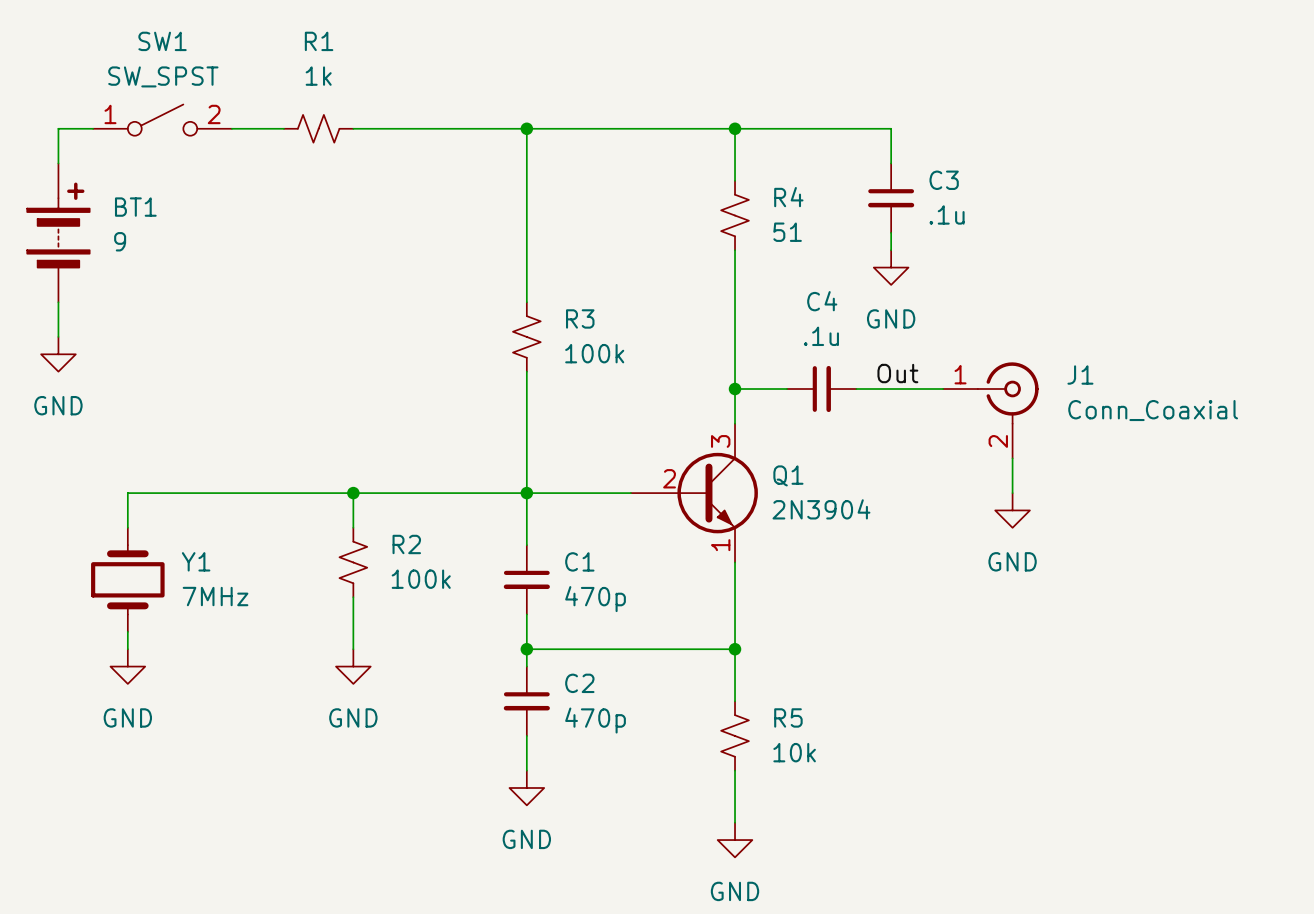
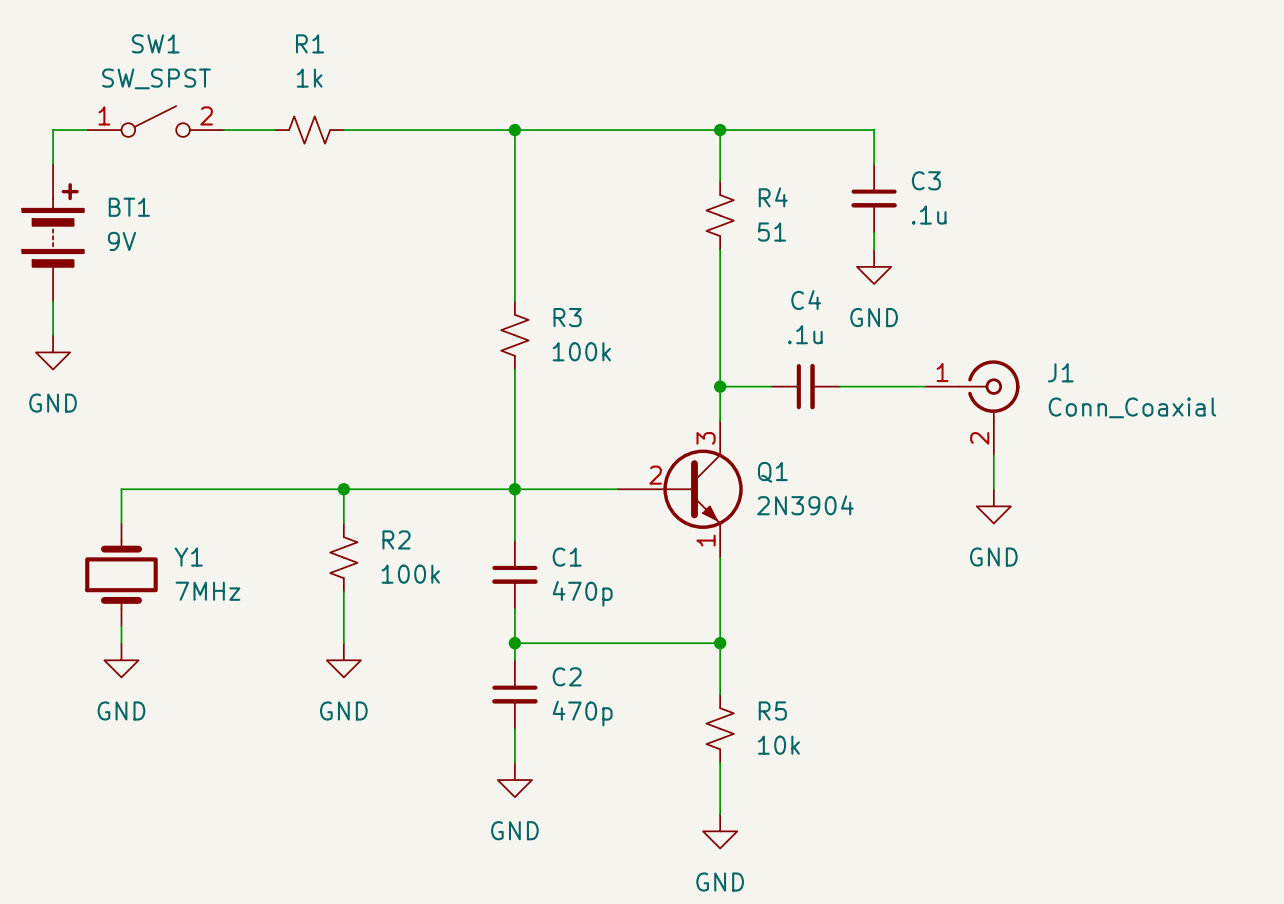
BT1 value: 9 (120, 241) -> 9V (122, 241)
label: Out (897, 373) -> none

